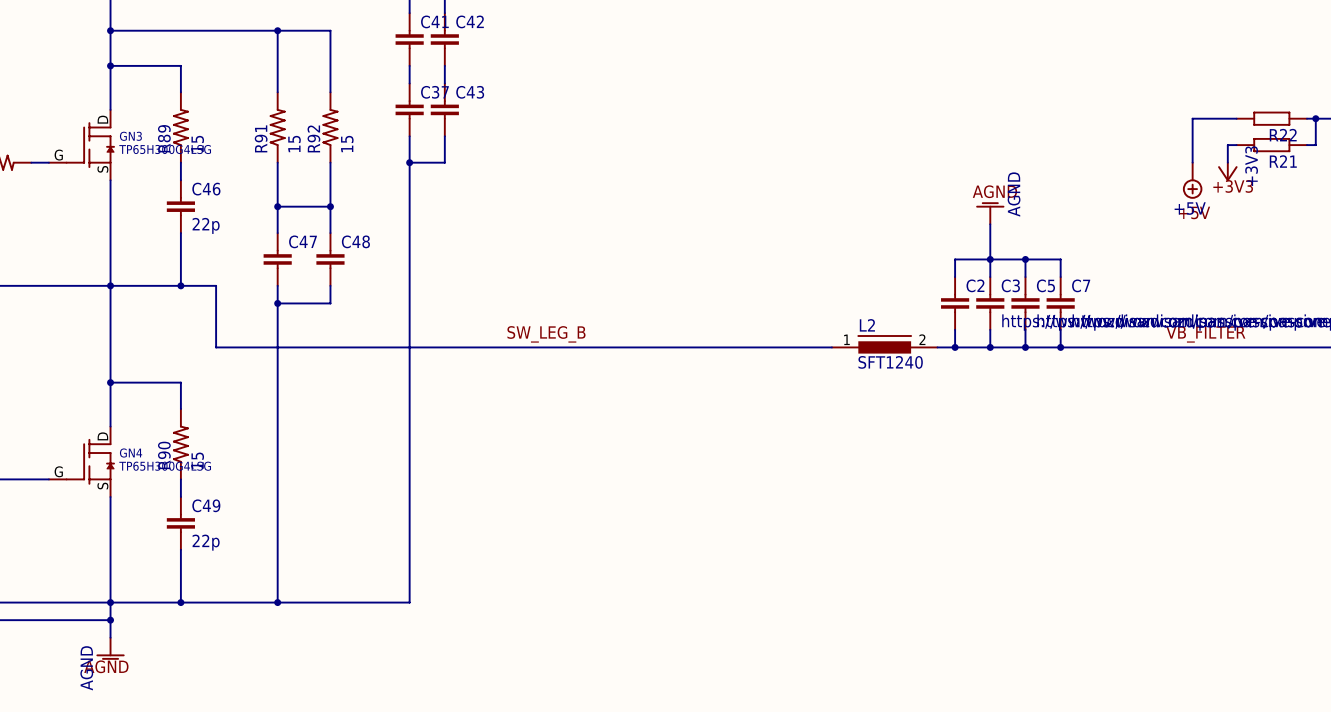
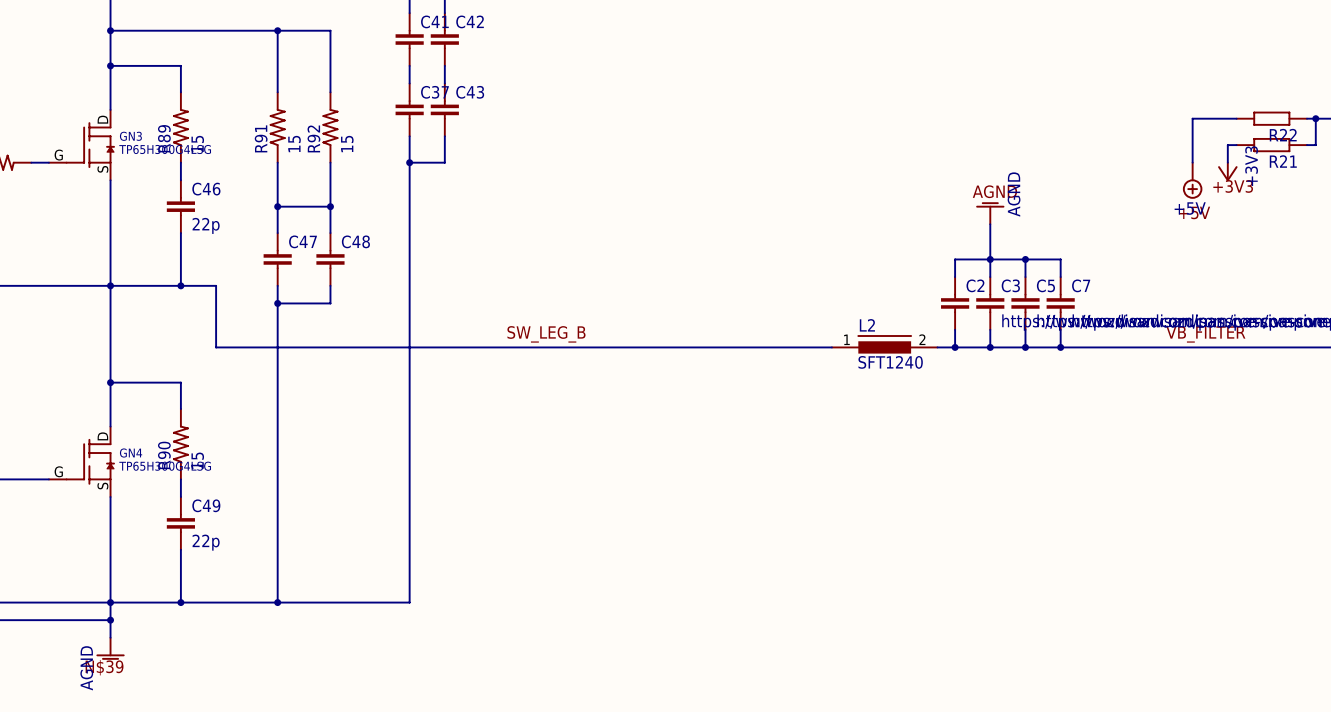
label: AGND (106, 666) -> N$39 (104, 667)

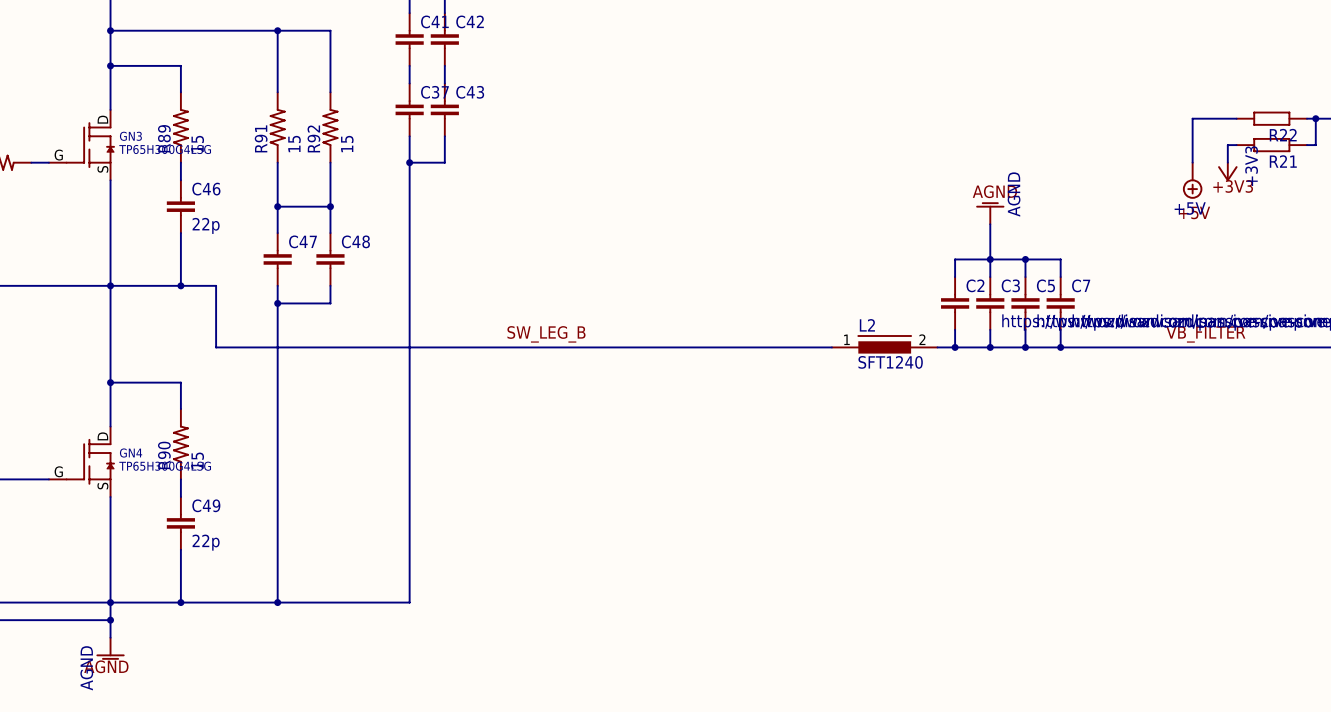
label: N$39 (104, 667) -> AGND (106, 666)

